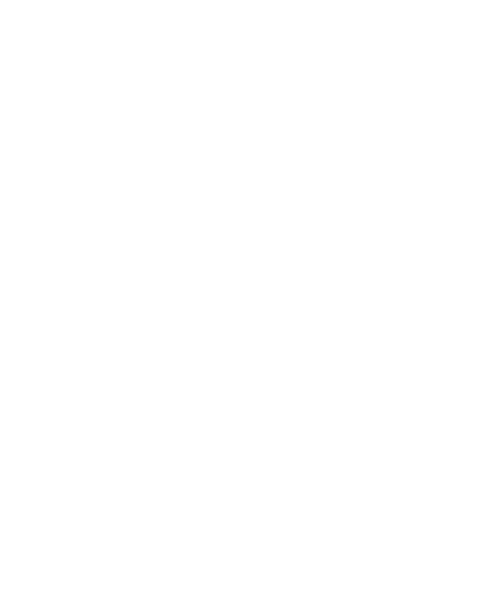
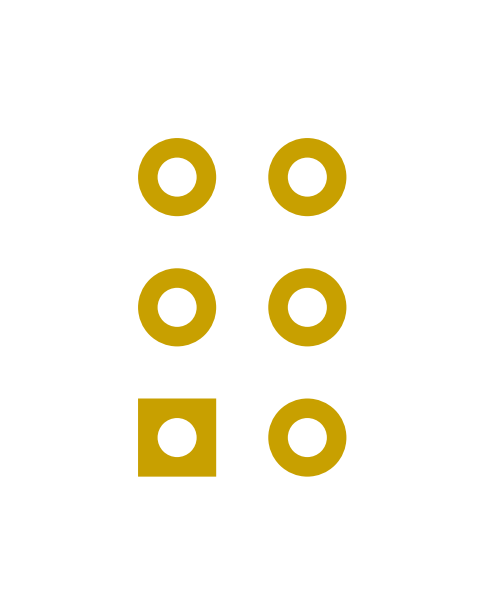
part: none -> (242, 307)

